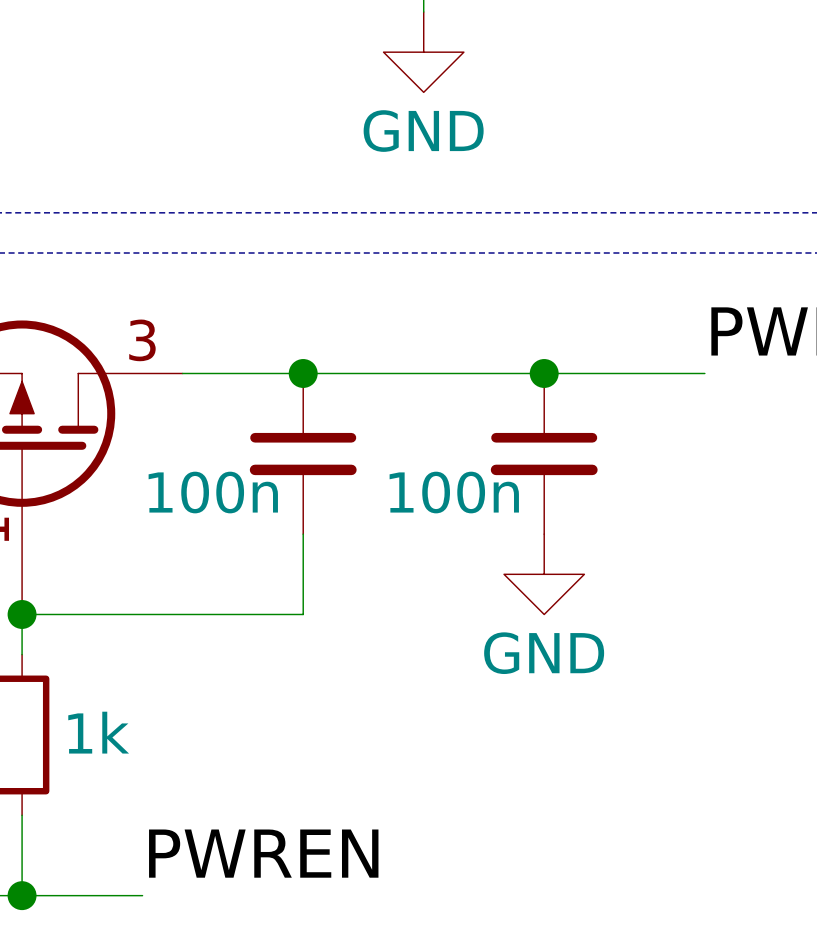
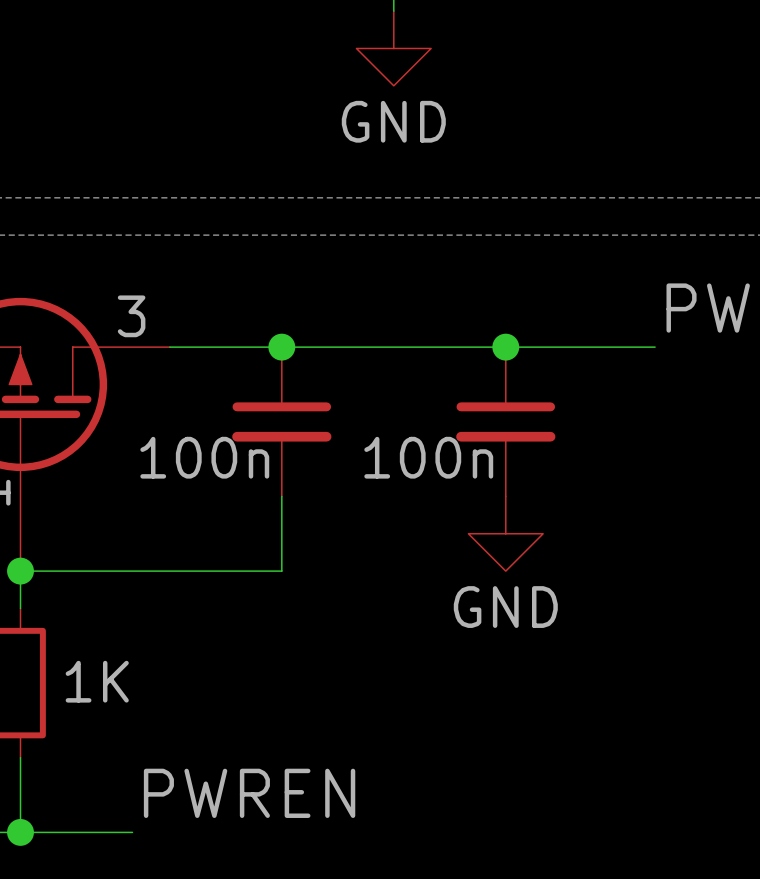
part value: 1k (98, 732) -> 1K (97, 681)

